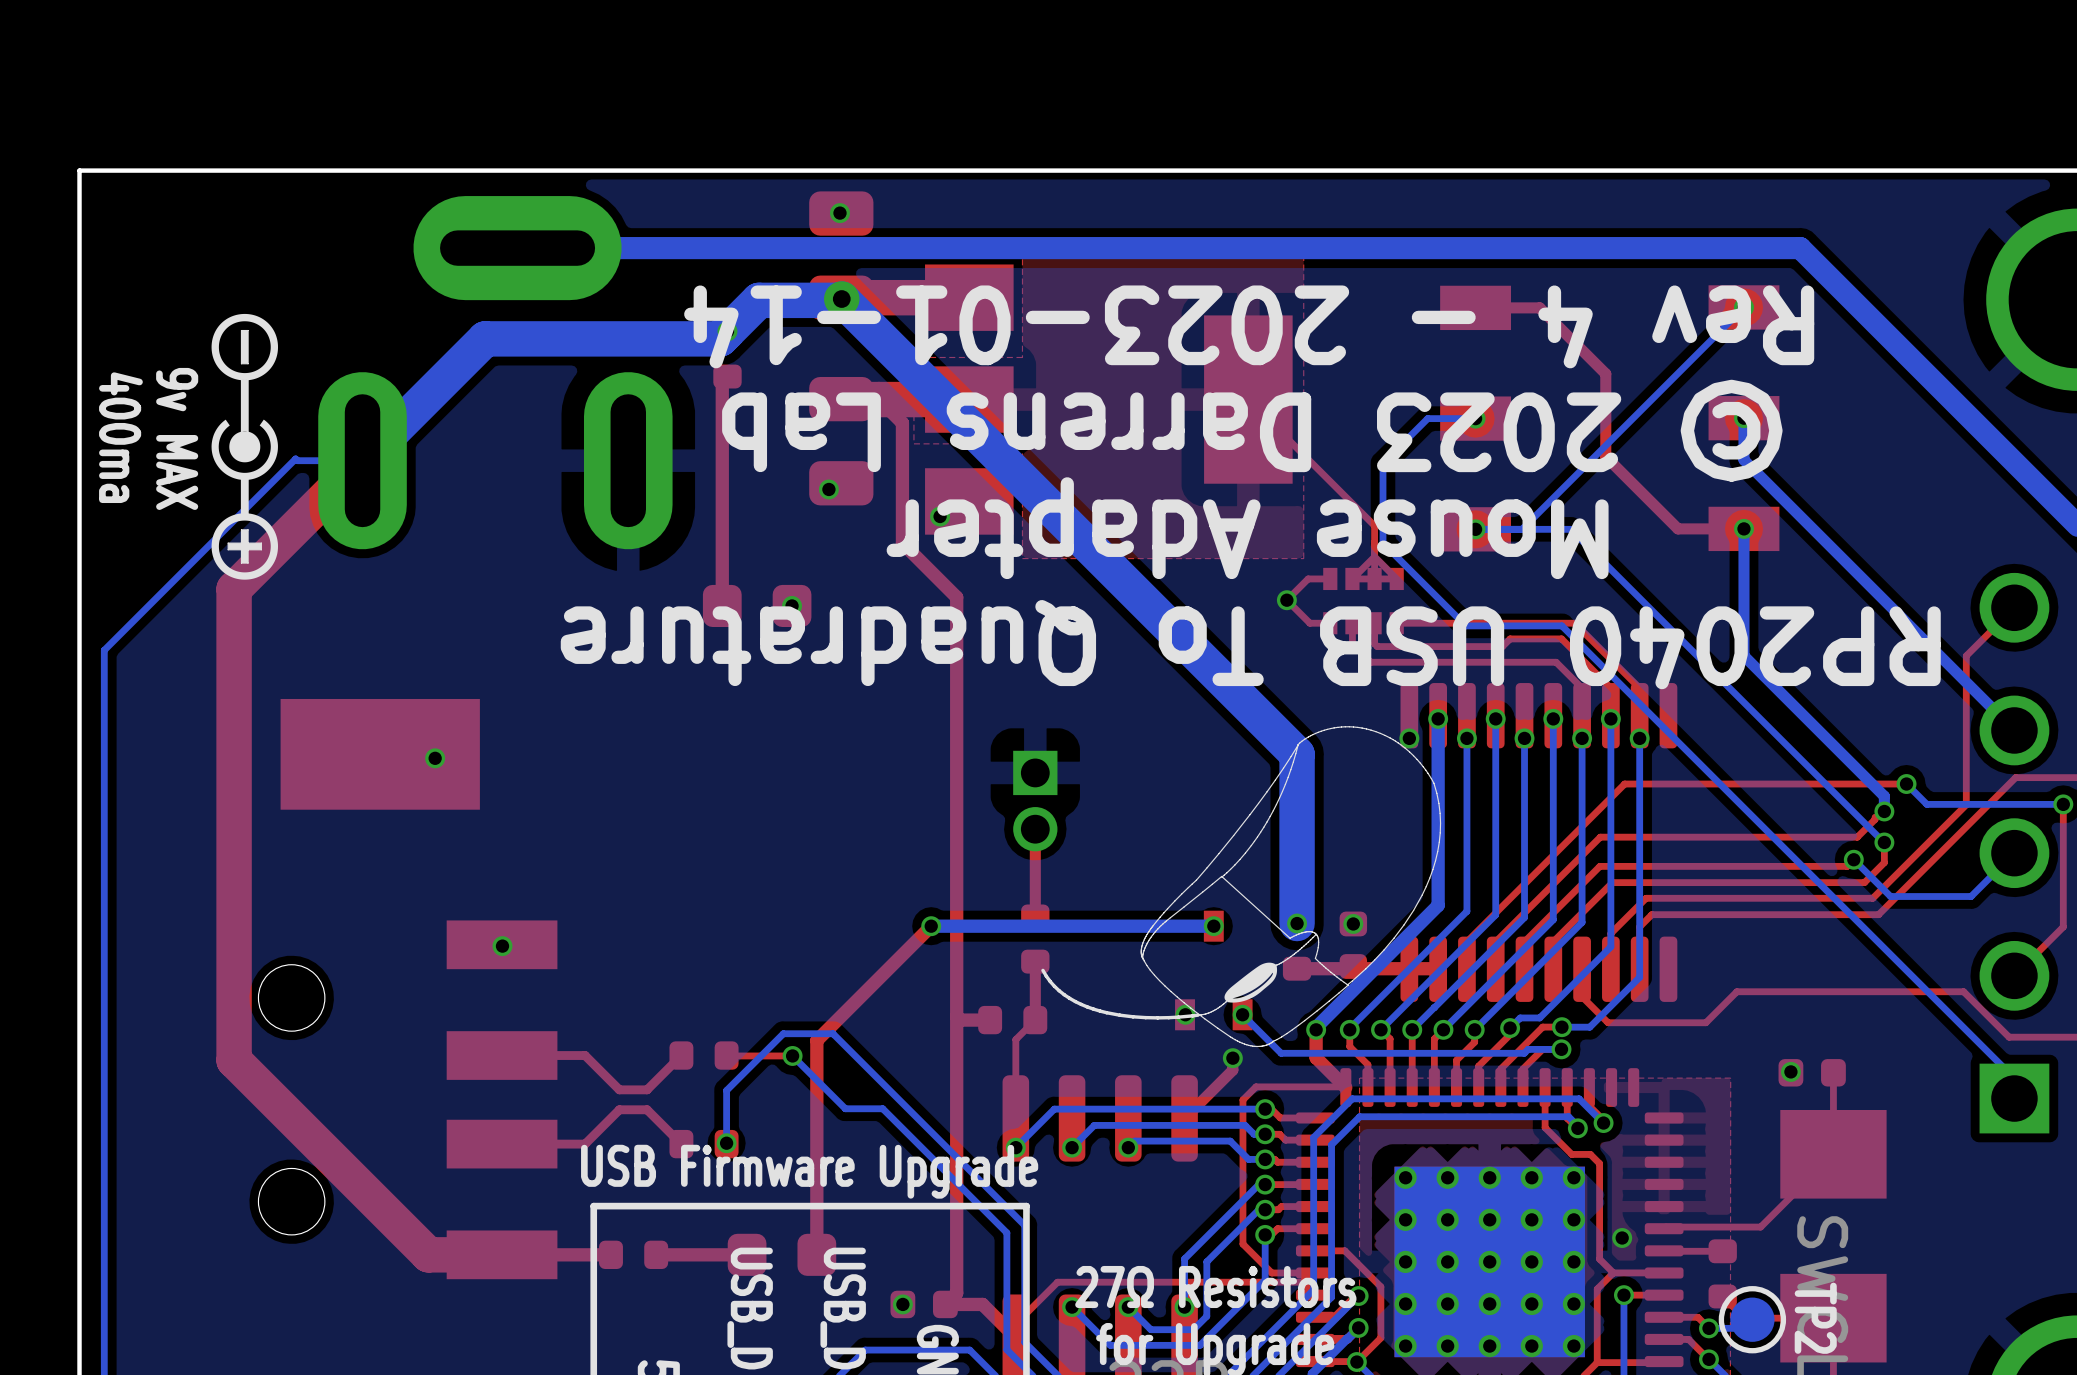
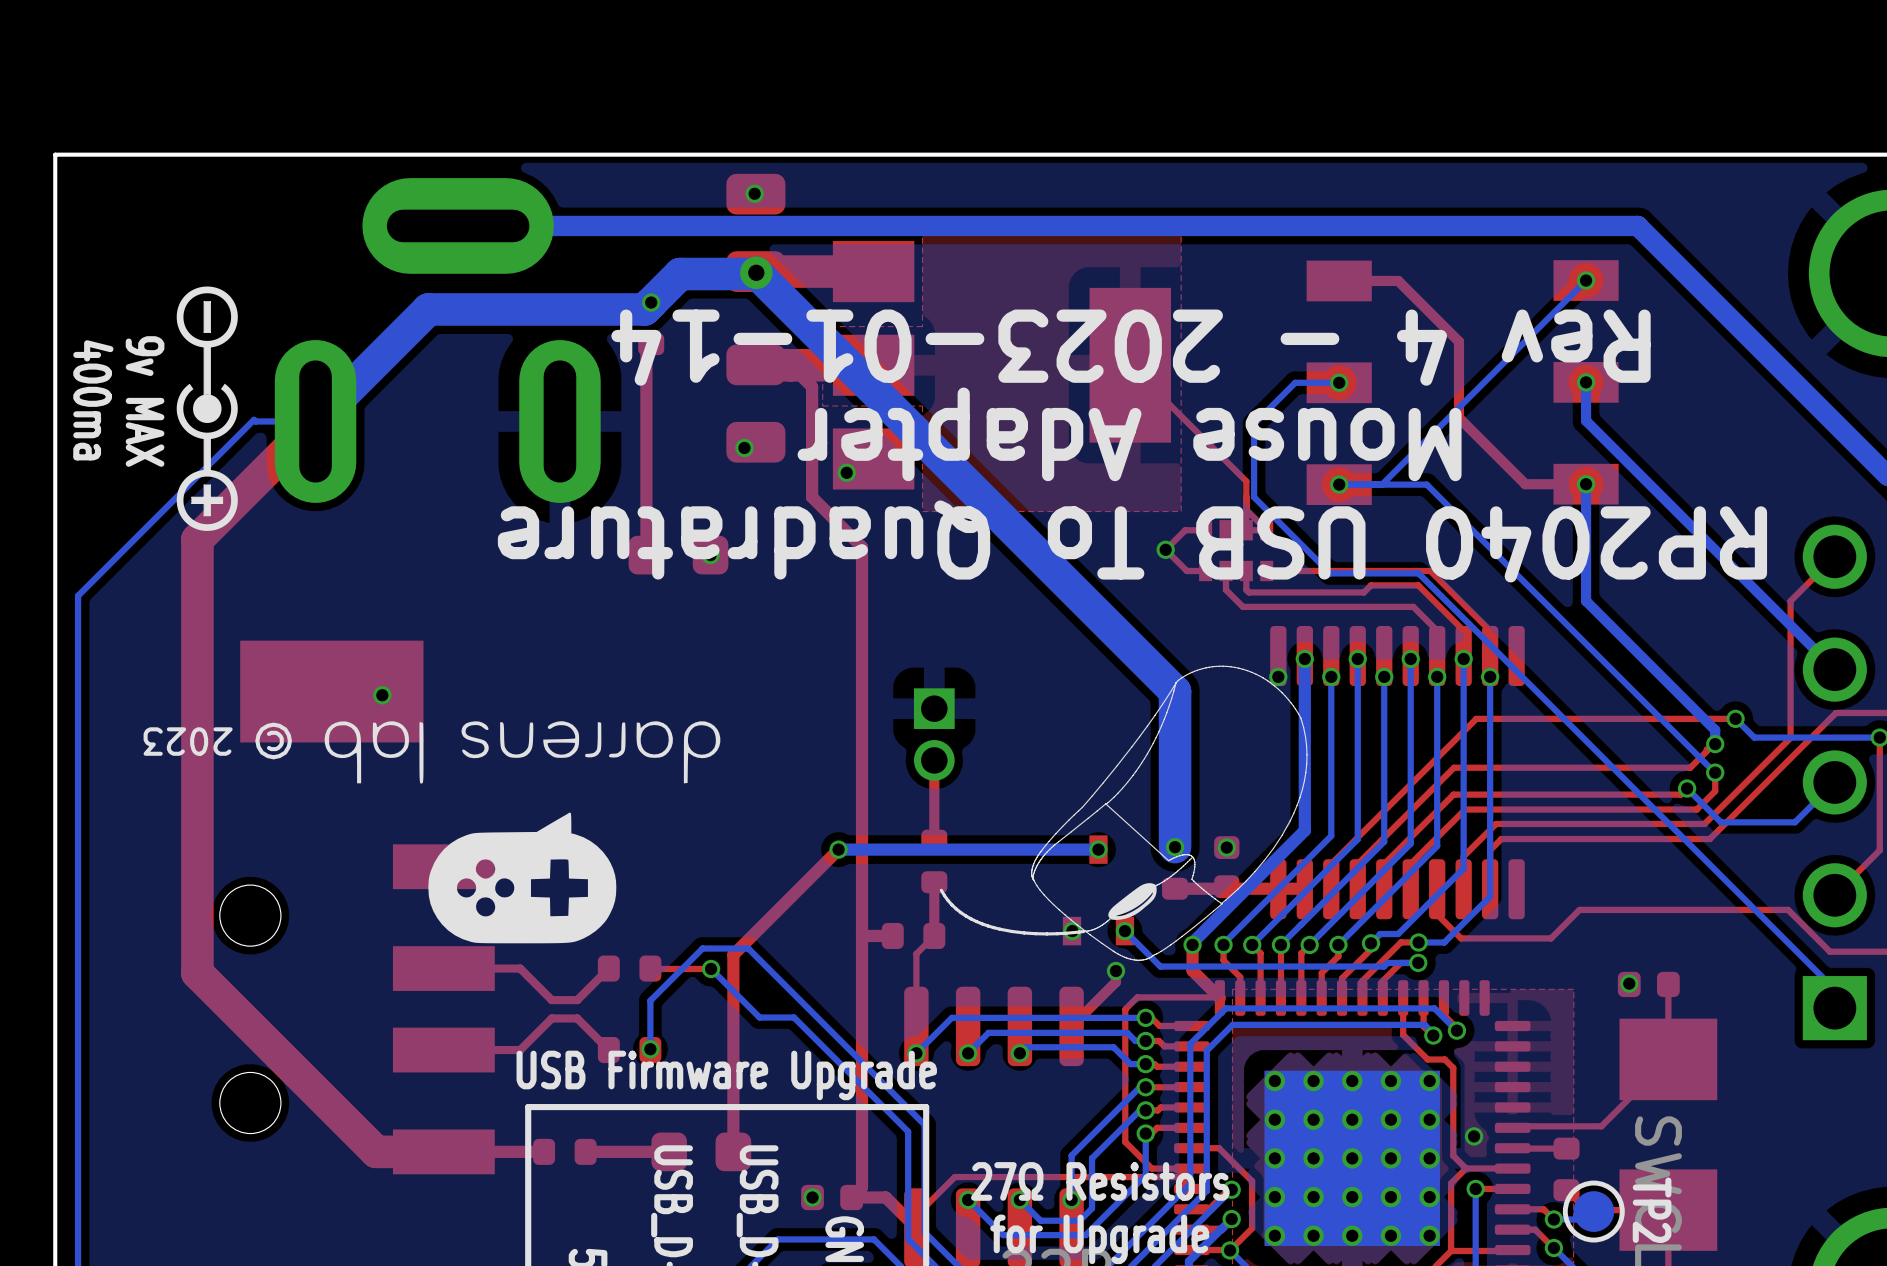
text position: Rev 4 - 2023-01-14 (1249, 326) -> Rev 4 - 2023-01-14 (1131, 347)
text: © 2023 Darrens Lab (1252, 430) -> none
text position: Mouse Adapter (1247, 528) -> Mouse Adapter (1129, 434)
text position: RP2040 USB To Quadrature (1250, 644) -> RP2040 USB To Quadrature (1132, 541)
drawing: none -> [324, 721, 721, 944]
text: none -> © 2023 (217, 740)

